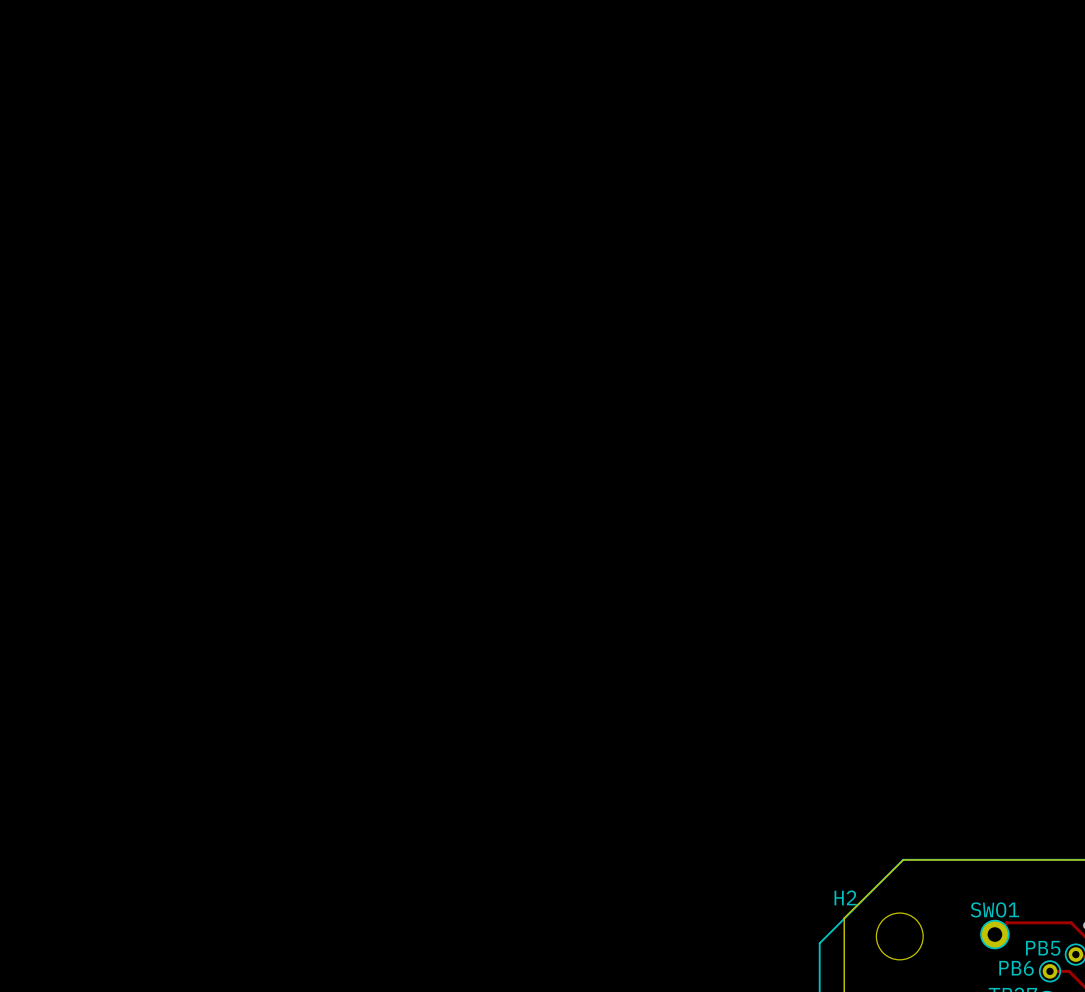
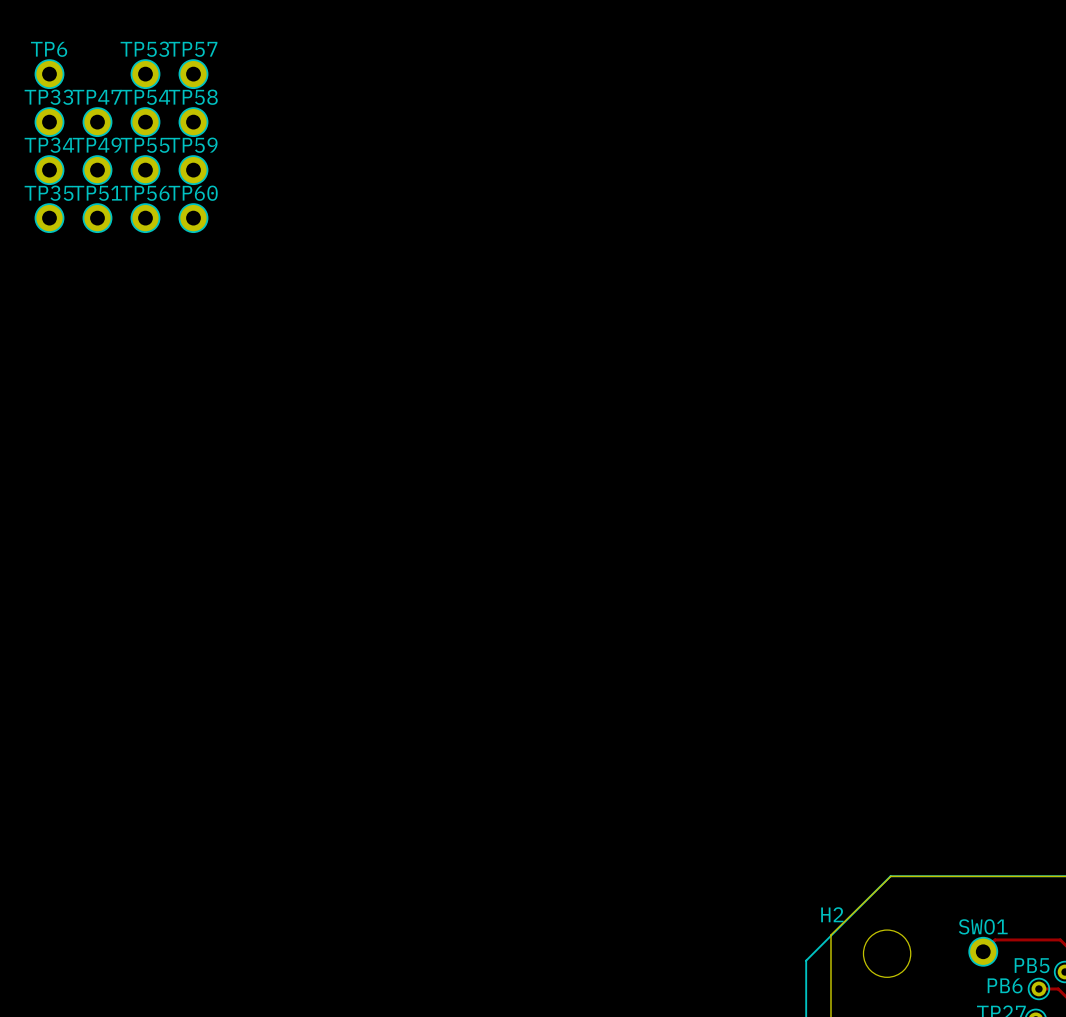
TP6: none -> (49, 74)
TP53: none -> (145, 74)
TP57: none -> (193, 74)
TP33: none -> (49, 122)
TP47: none -> (97, 122)
TP54: none -> (145, 122)
TP58: none -> (193, 122)
TP34: none -> (49, 170)
TP49: none -> (97, 170)
TP55: none -> (145, 170)
TP59: none -> (193, 170)
TP35: none -> (49, 218)
TP51: none -> (97, 218)
TP56: none -> (145, 218)
TP60: none -> (193, 218)

